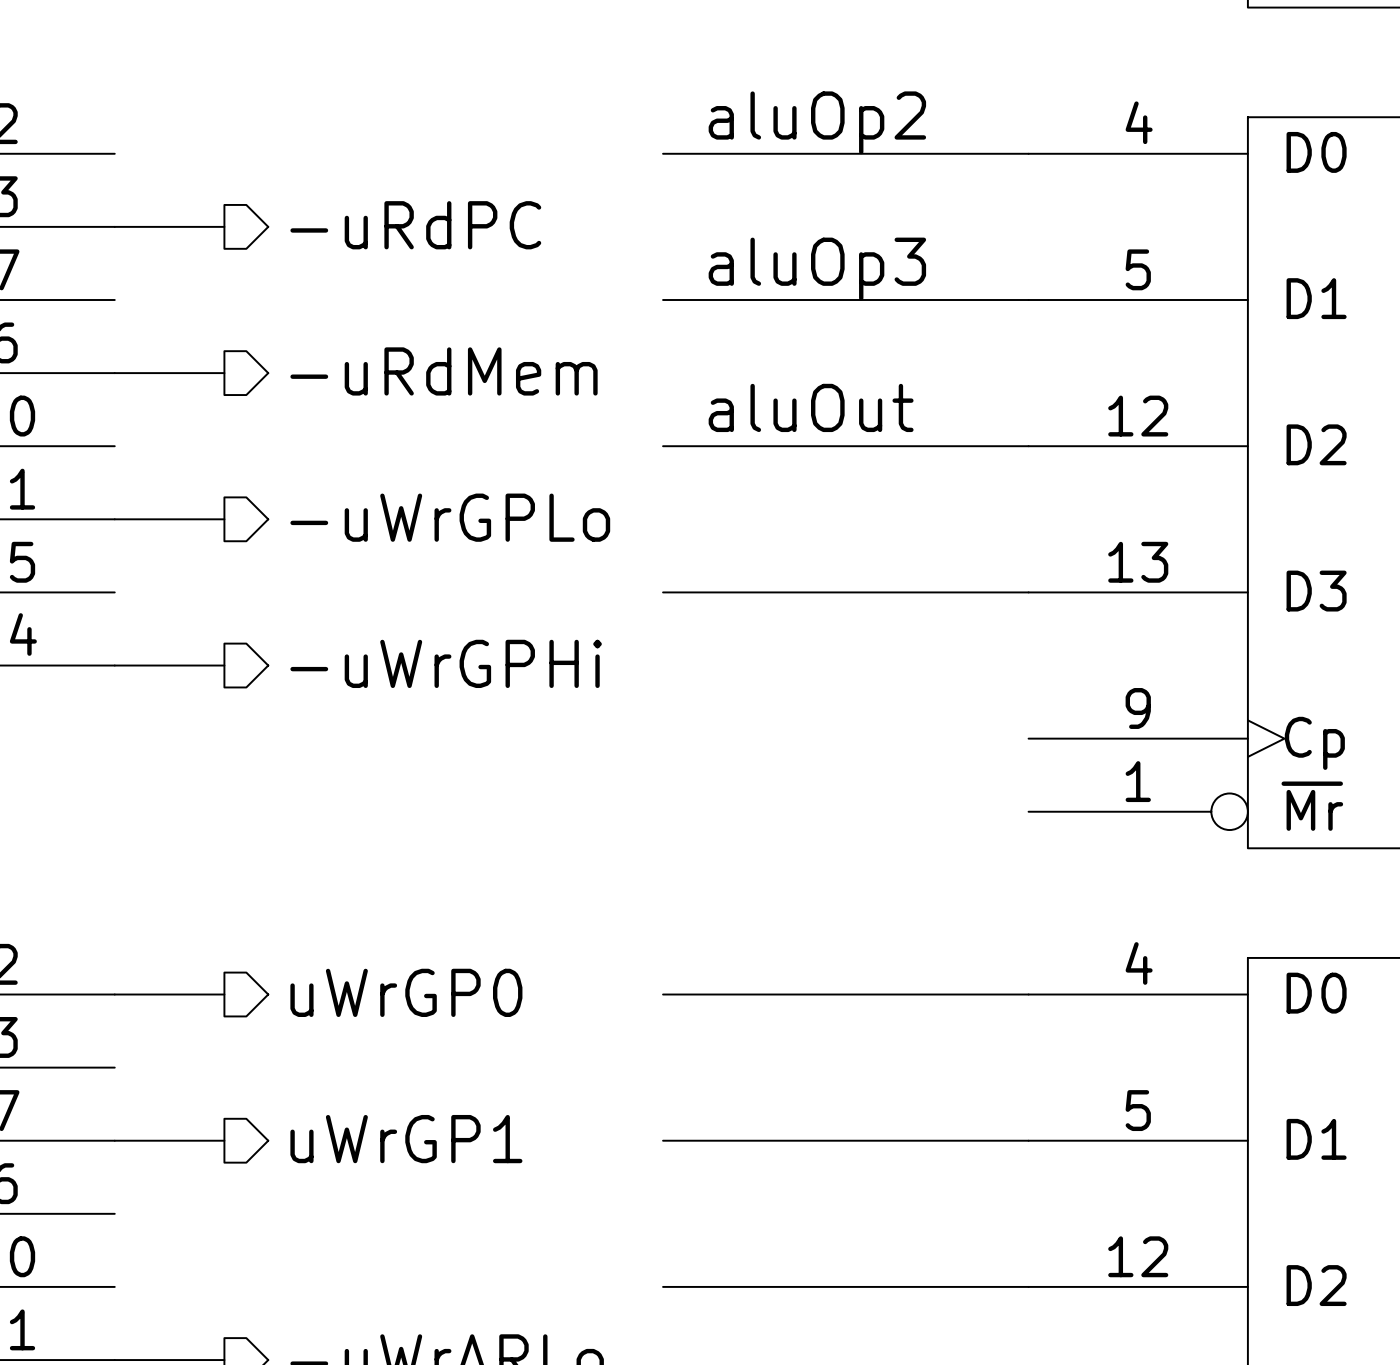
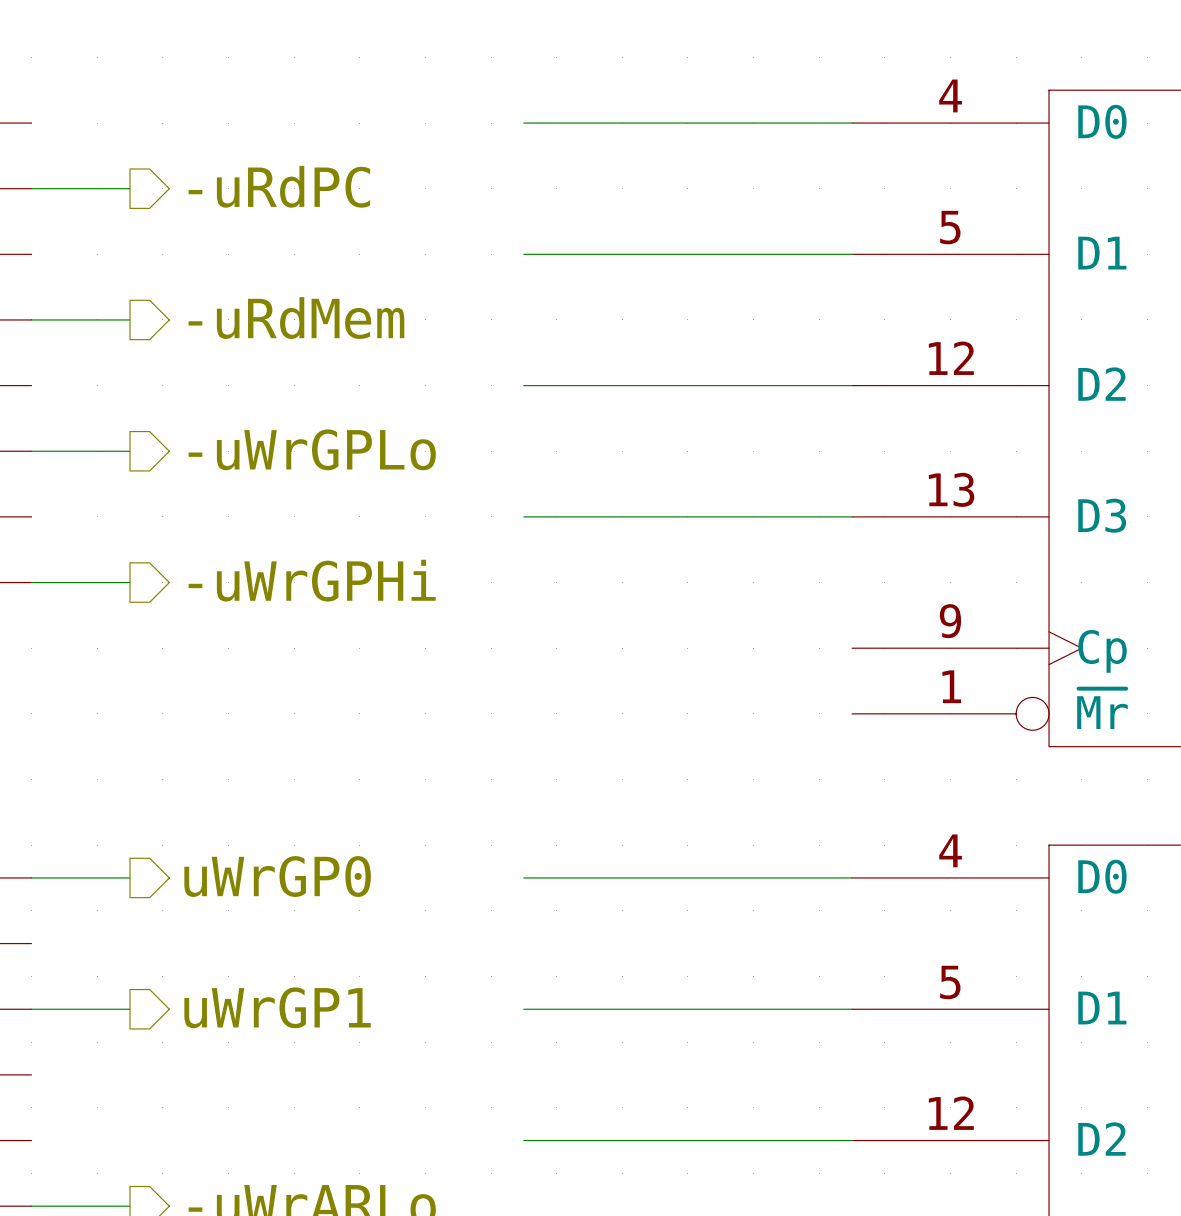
label: aluOp2 (817, 122) -> none
label: aluOp3 (817, 269) -> none
label: aluOut (811, 407) -> none

